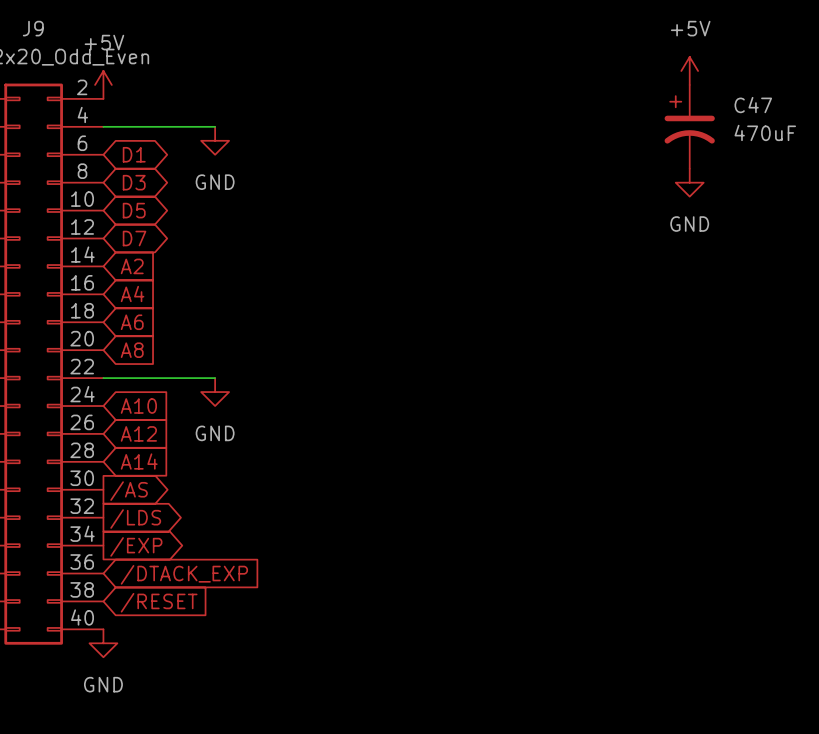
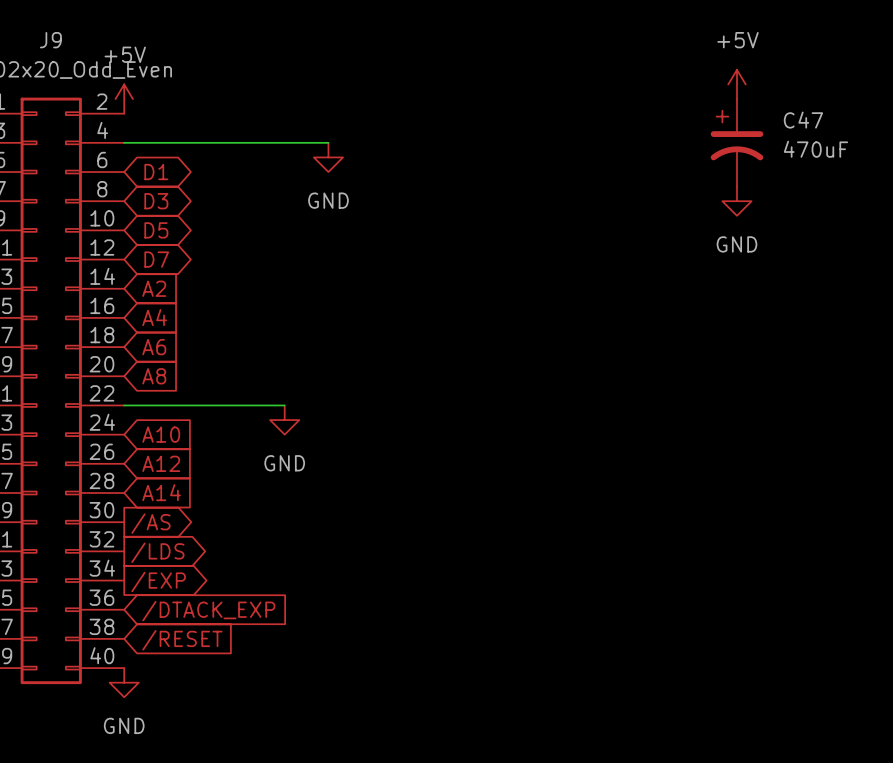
wire: none -> (240, 142) (328, 142)
power symbol position: GND (215, 140) -> GND (328, 157)
wire: none -> (240, 405) (284, 405)
power symbol position: GND (215, 392) -> GND (284, 420)

